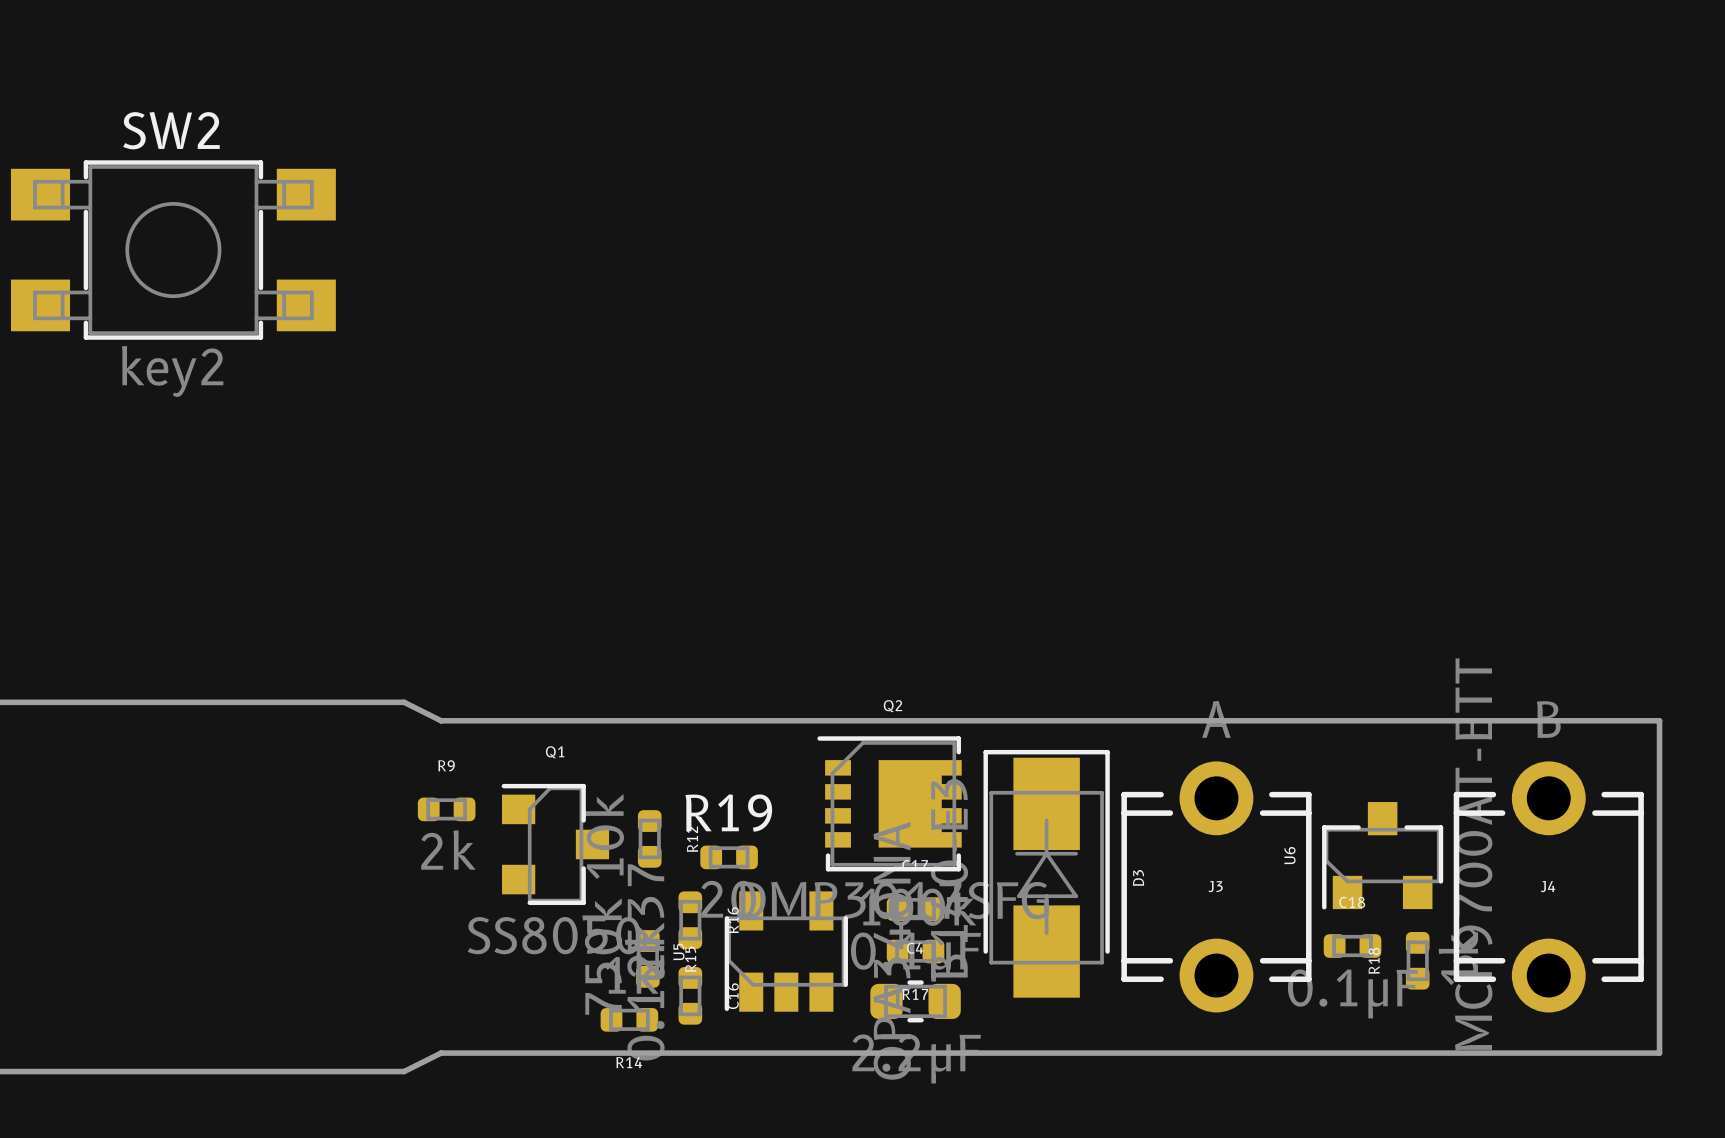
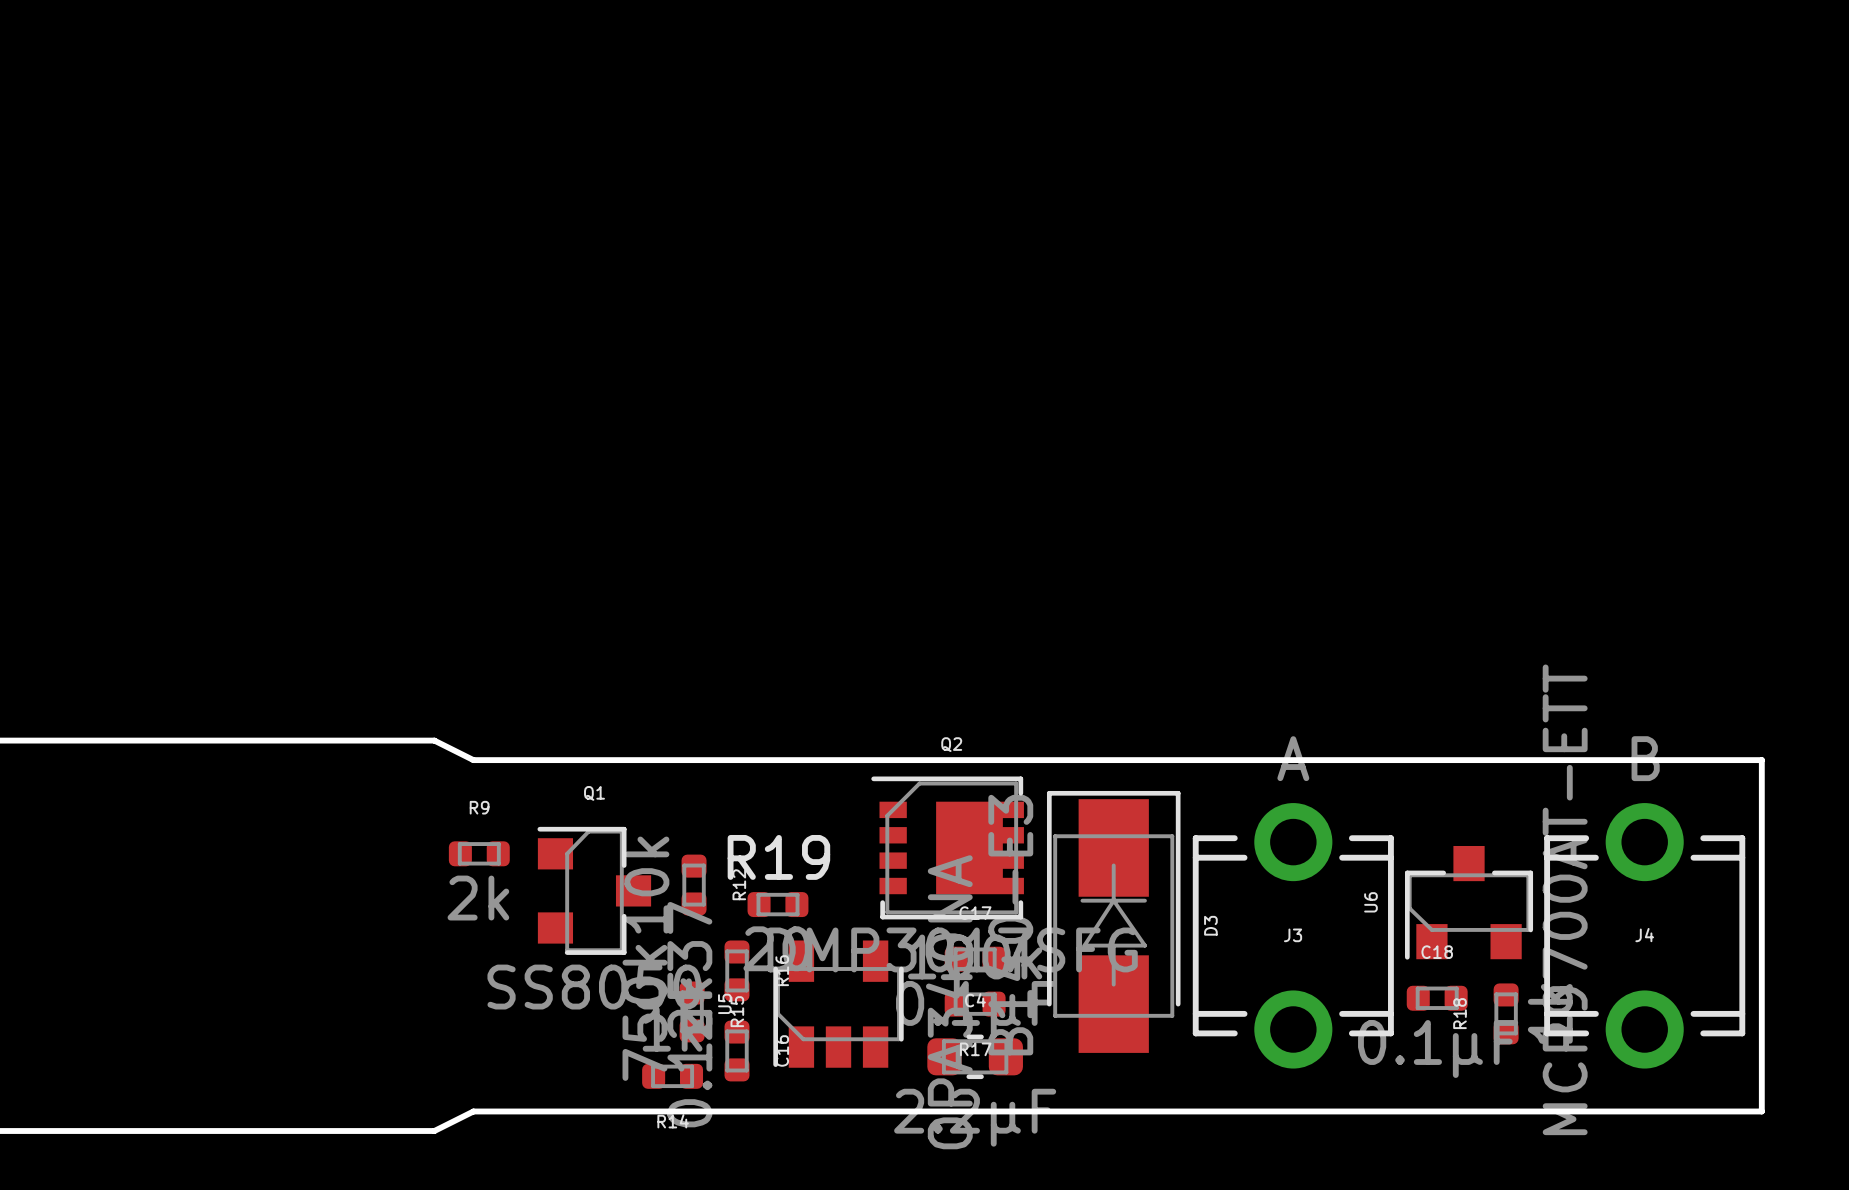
SW2: key2 (173, 250) -> none

